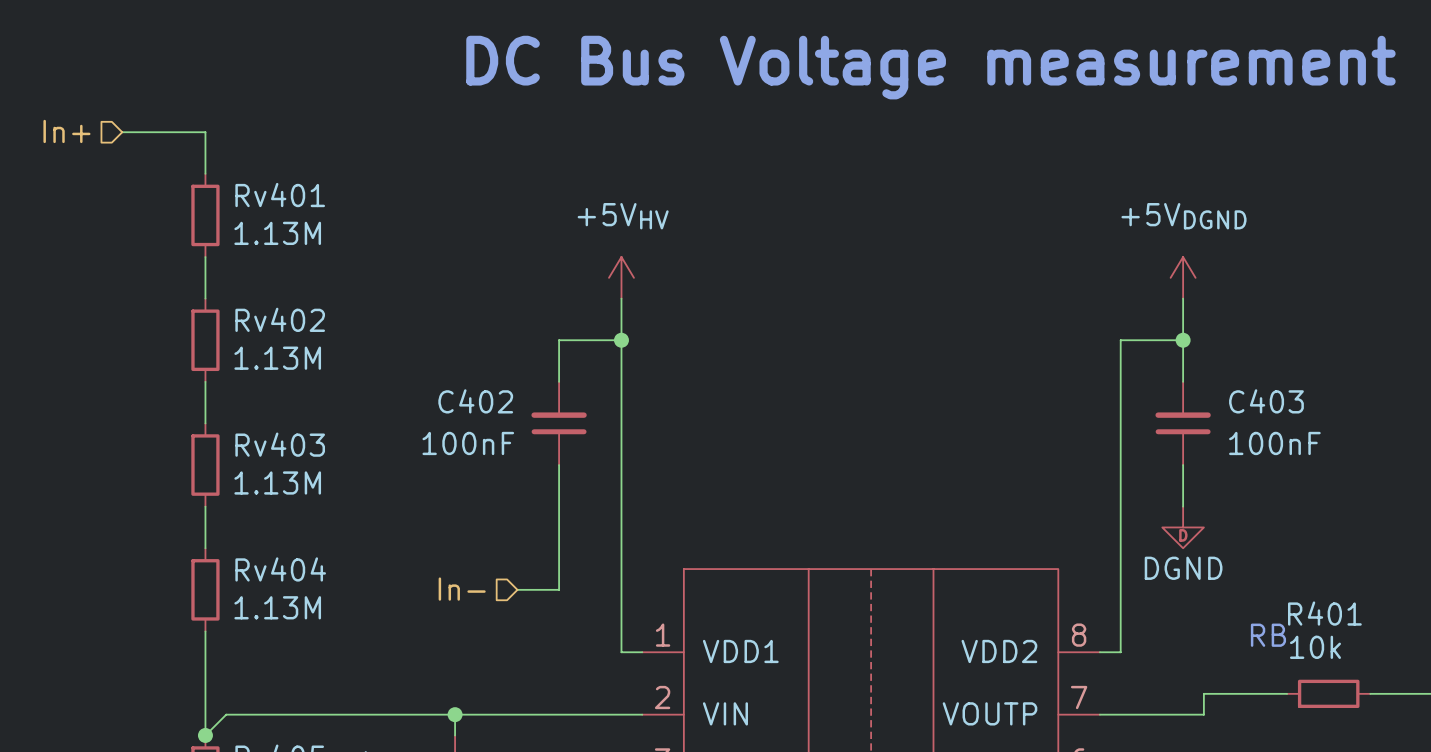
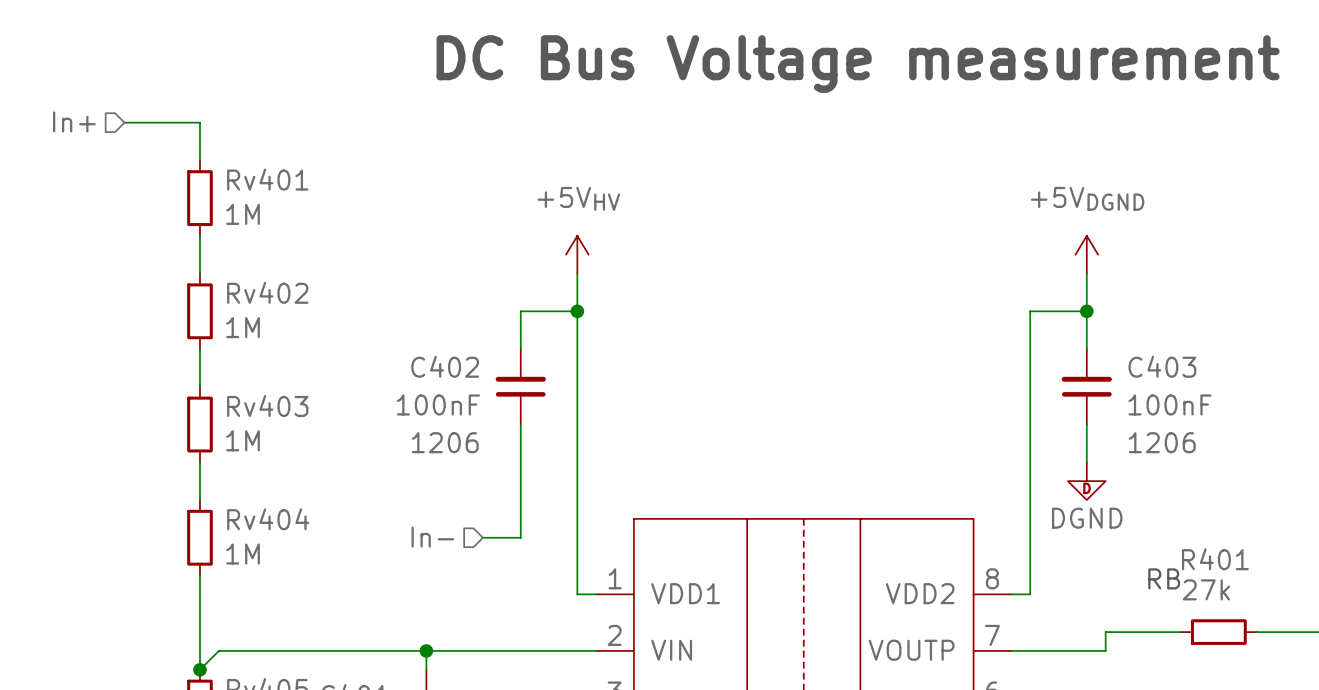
Rv401 value: 1.13M (277, 233) -> 1M (243, 214)
Rv402 value: 1.13M (277, 358) -> 1M (243, 327)
Rv403 value: 1.13M (277, 482) -> 1M (243, 440)
C402 text: none -> 1206 (445, 442)
C403 text: none -> 1206 (1162, 442)
Rv404 value: 1.13M (277, 607) -> 1M (243, 554)
R401 value: 10k (1315, 647) -> 27k (1206, 589)

